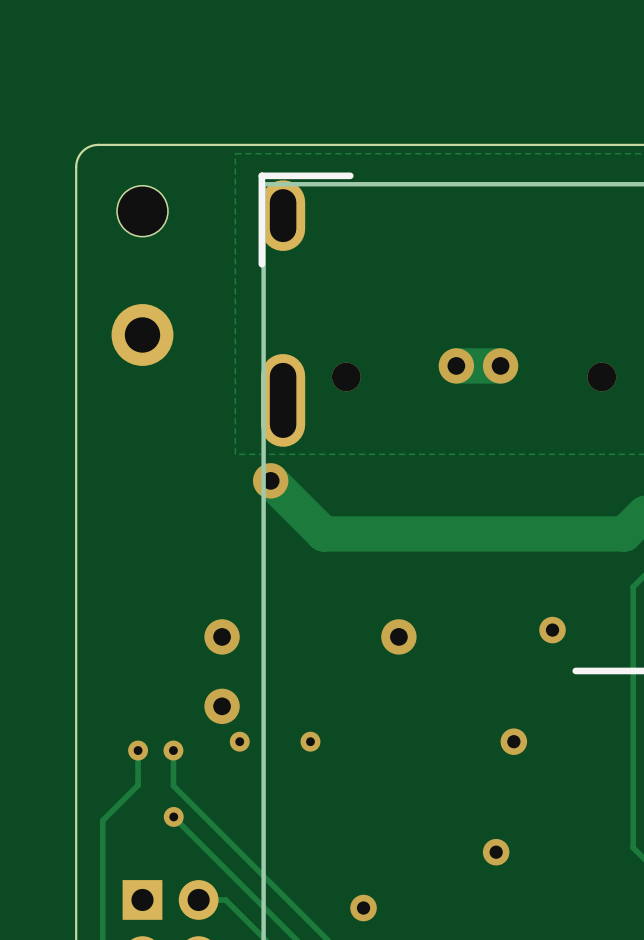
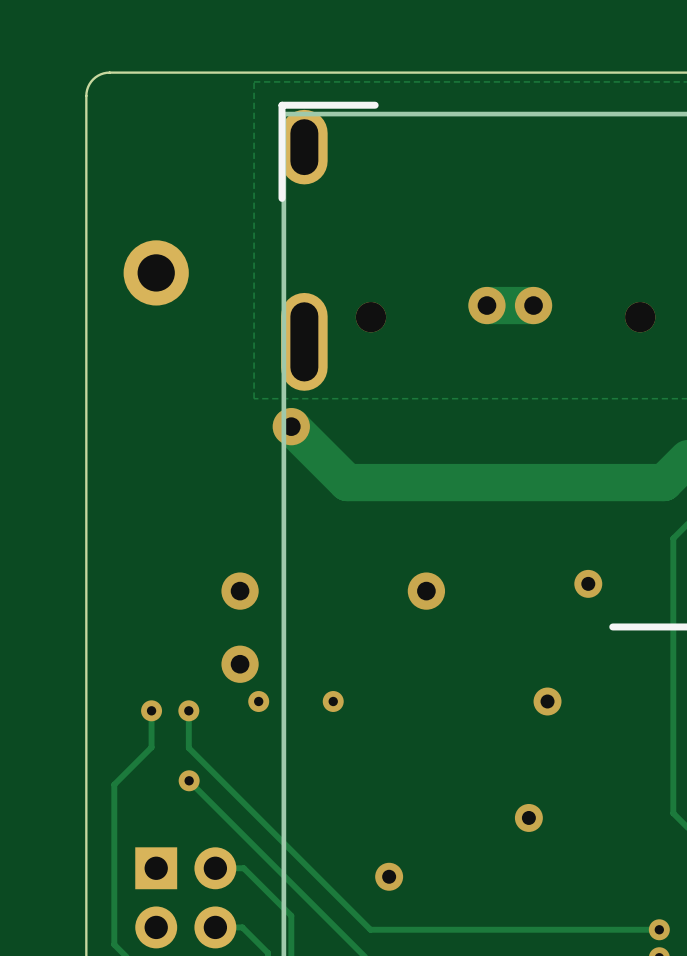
part: (142, 211) -> none

